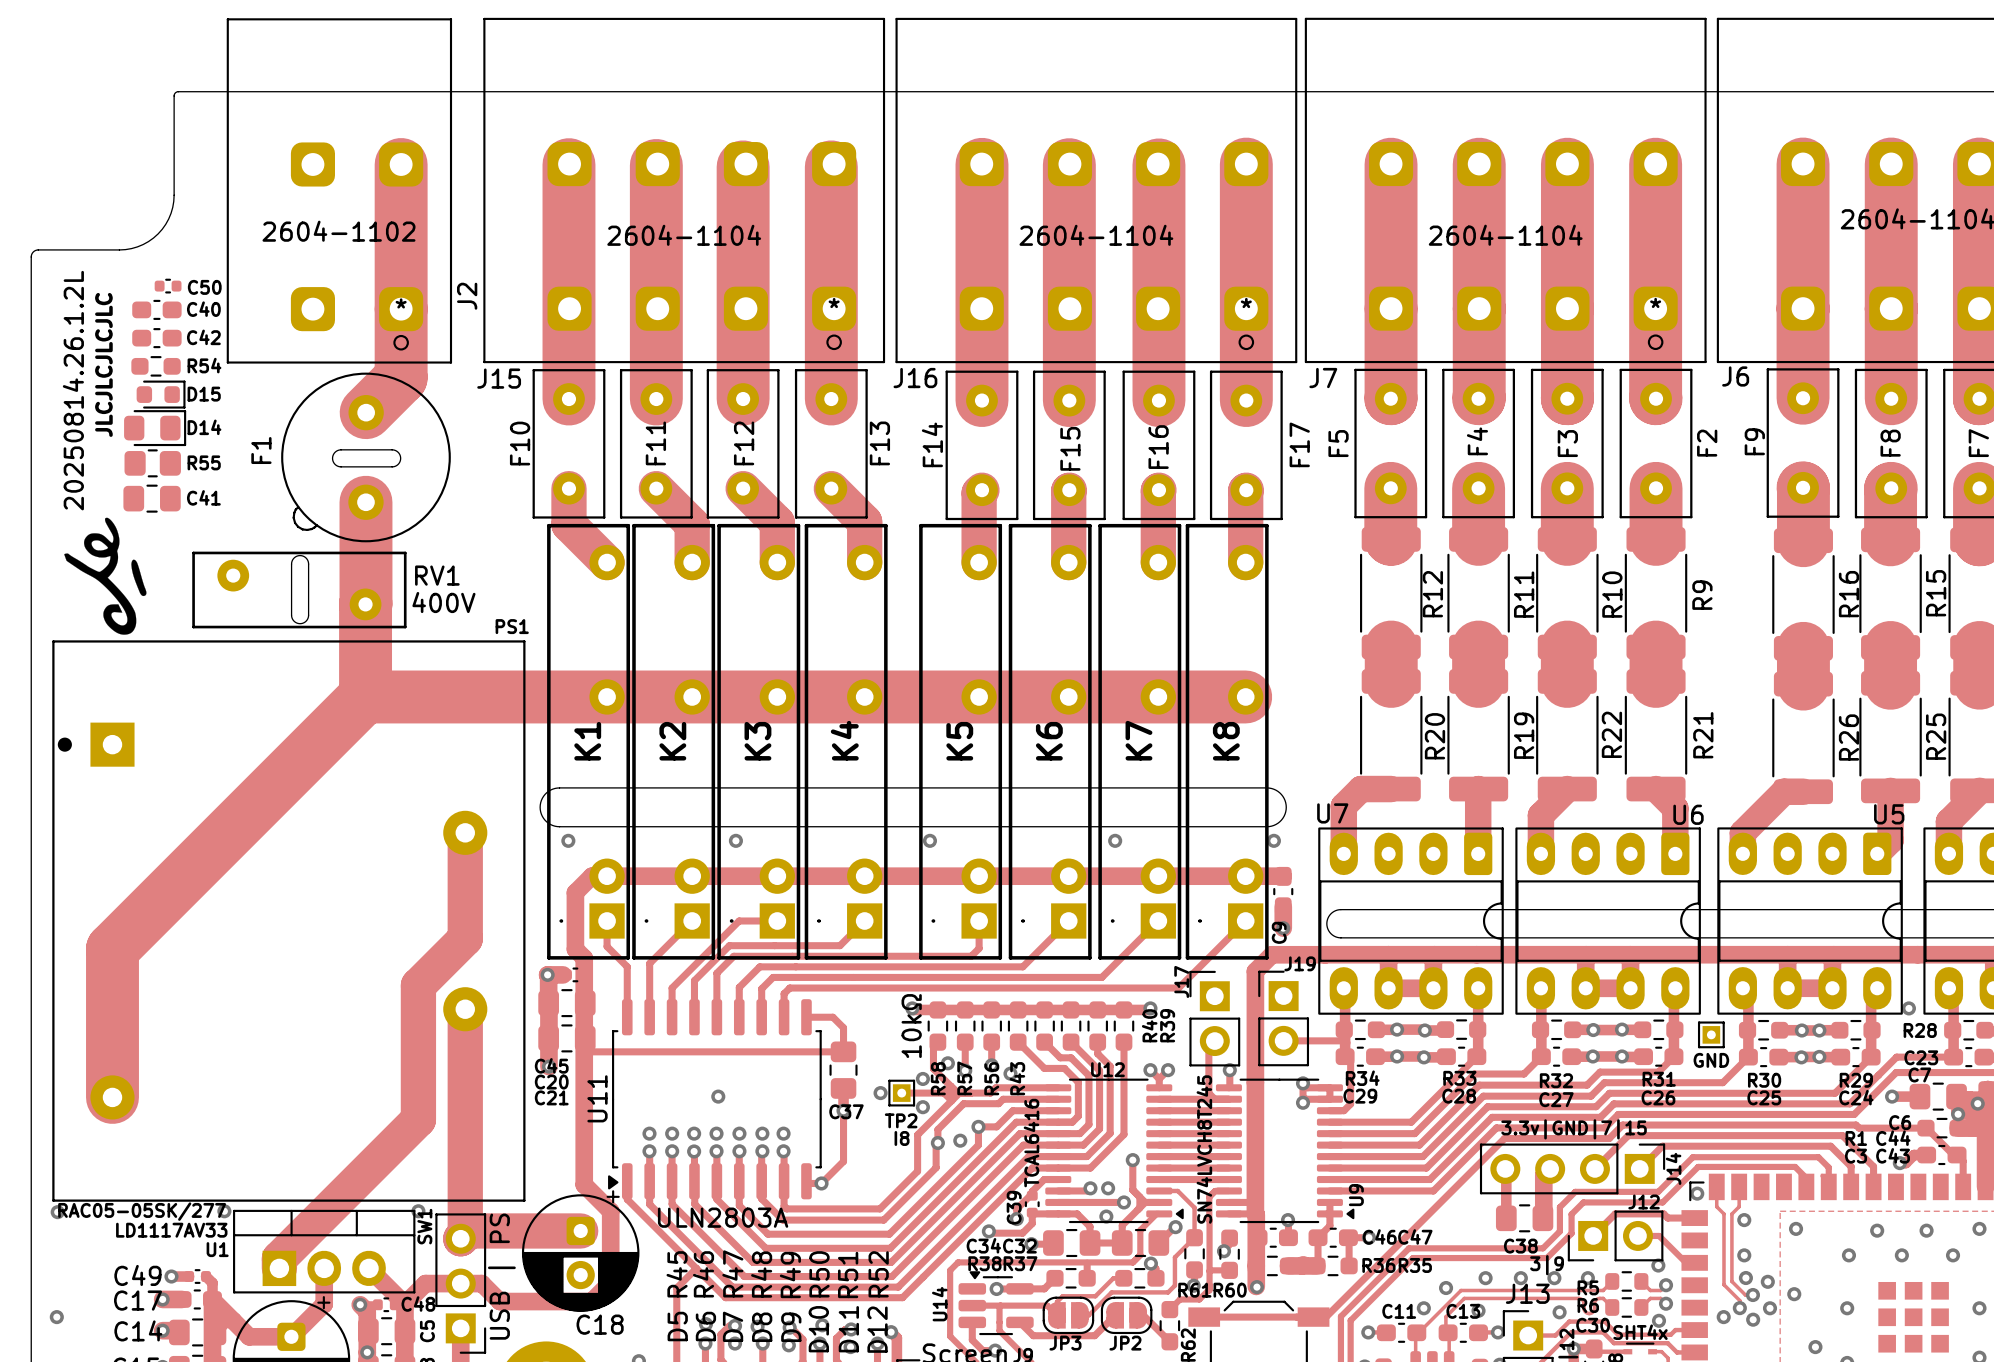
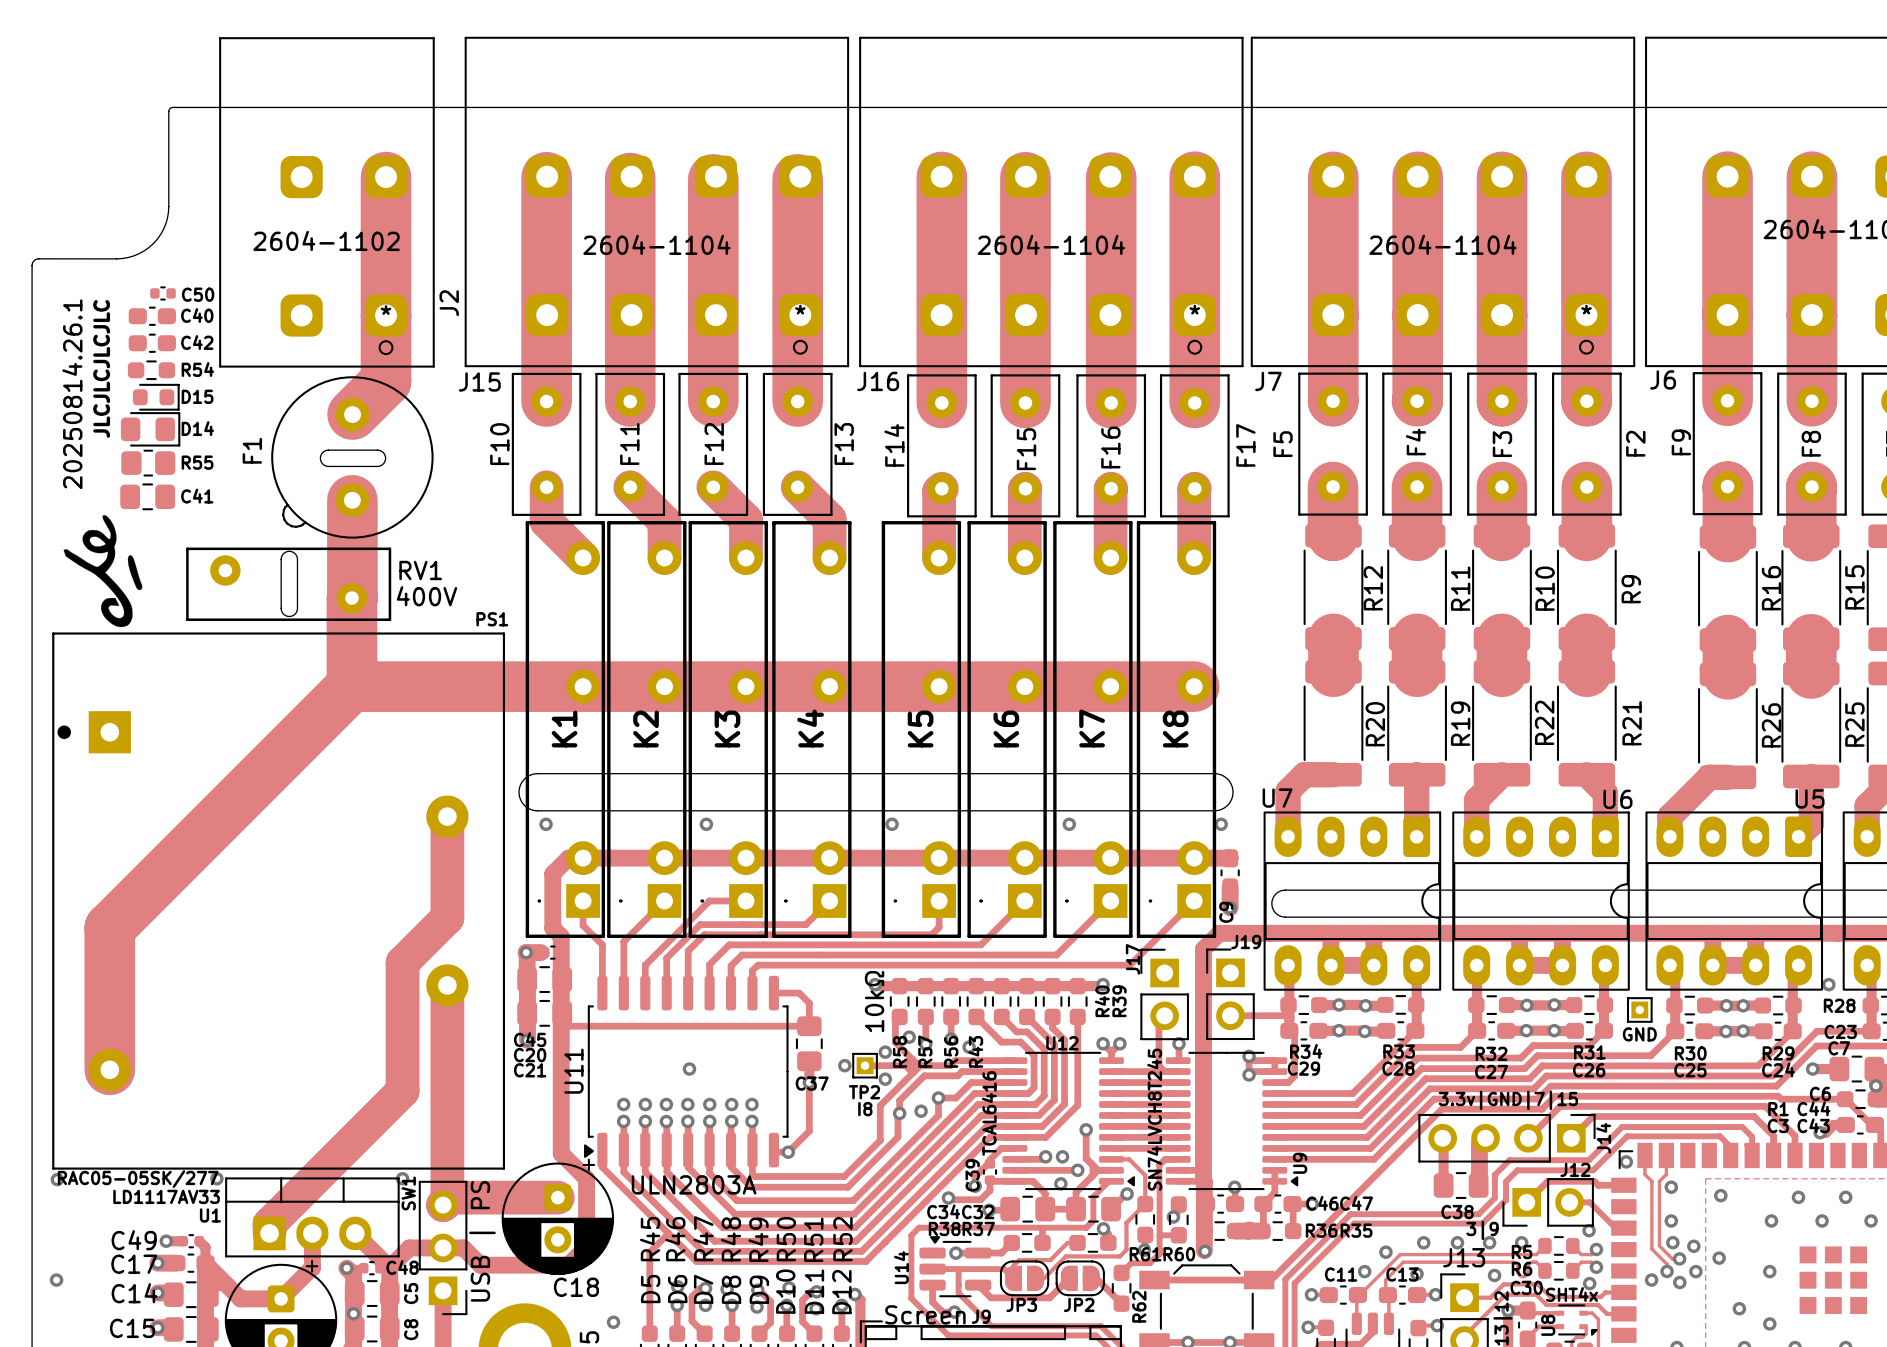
text: 20250814.26.1.2L (73, 390) -> 20250814.26.1 (72, 394)

